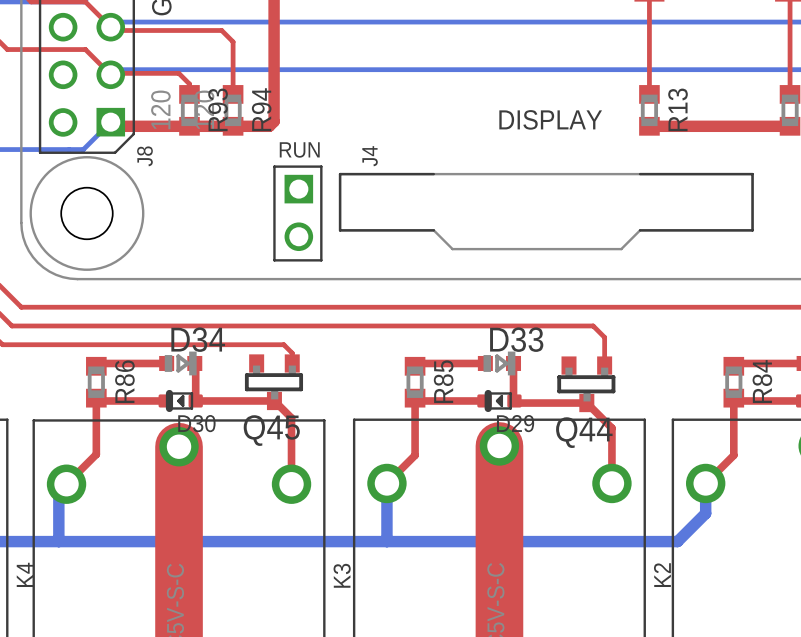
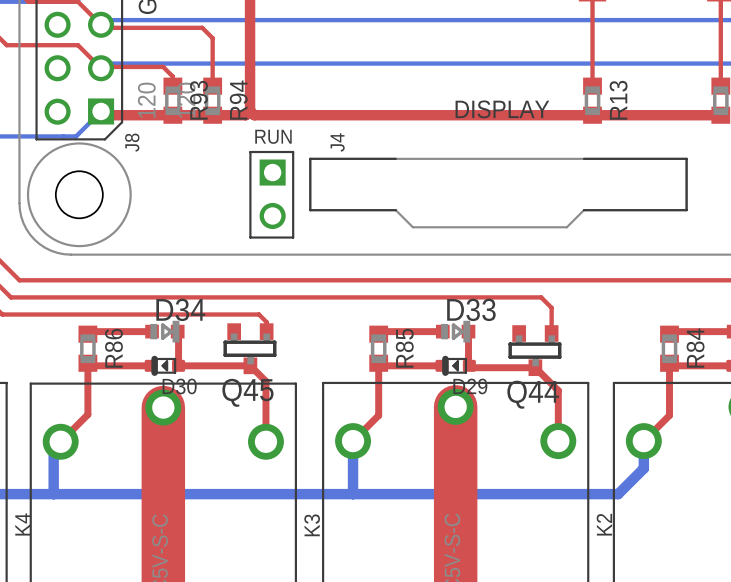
top track: none -> (250, 110) (254, 115) (592, 115)

